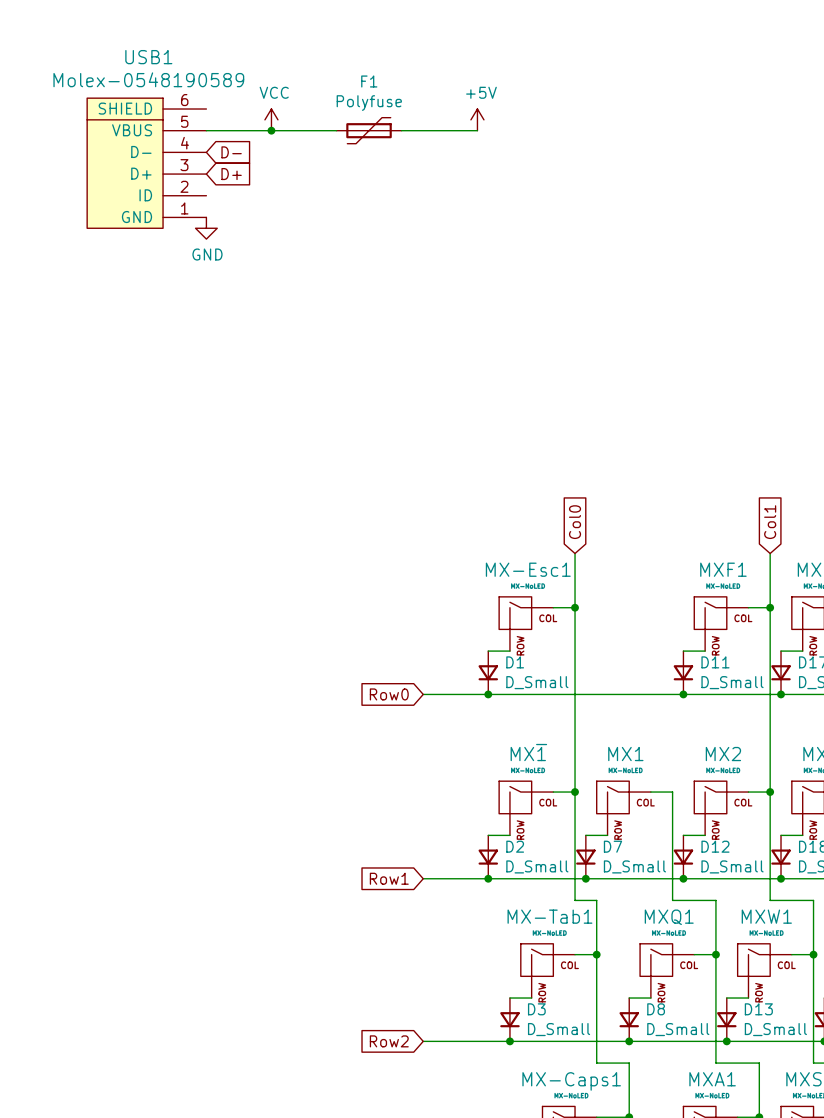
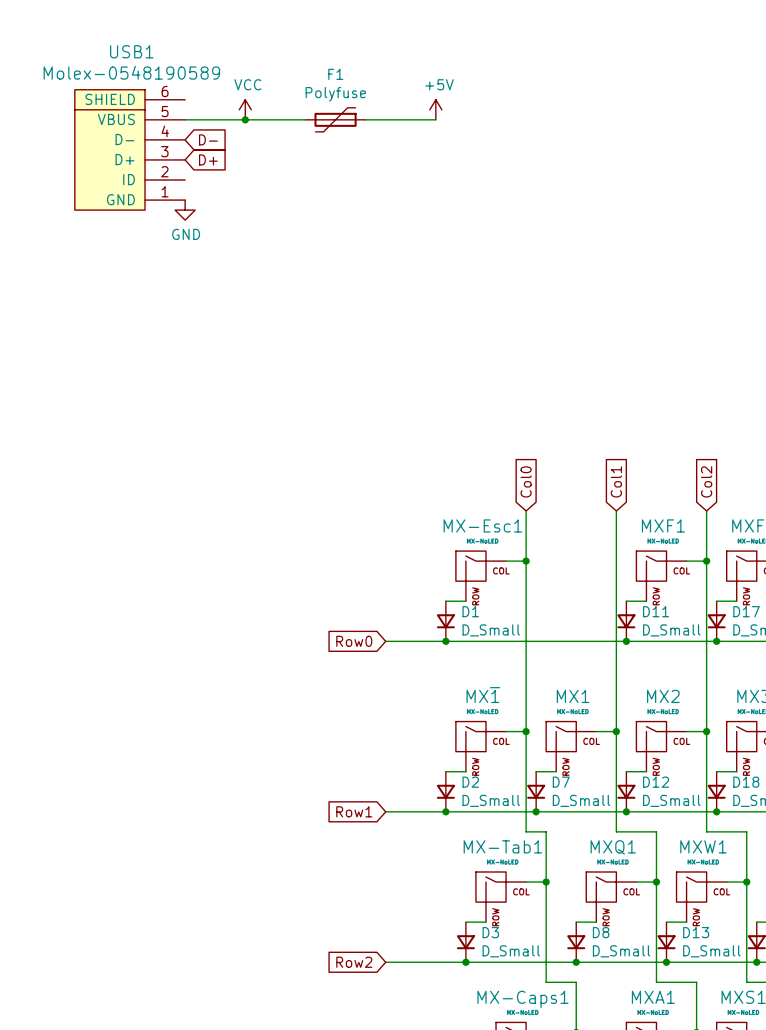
global label: none -> Col1 (616, 481)
global label: Col1 (770, 522) -> Col2 (706, 481)
wire: none -> (616, 510) (616, 731)
junction: none -> (616, 731)

